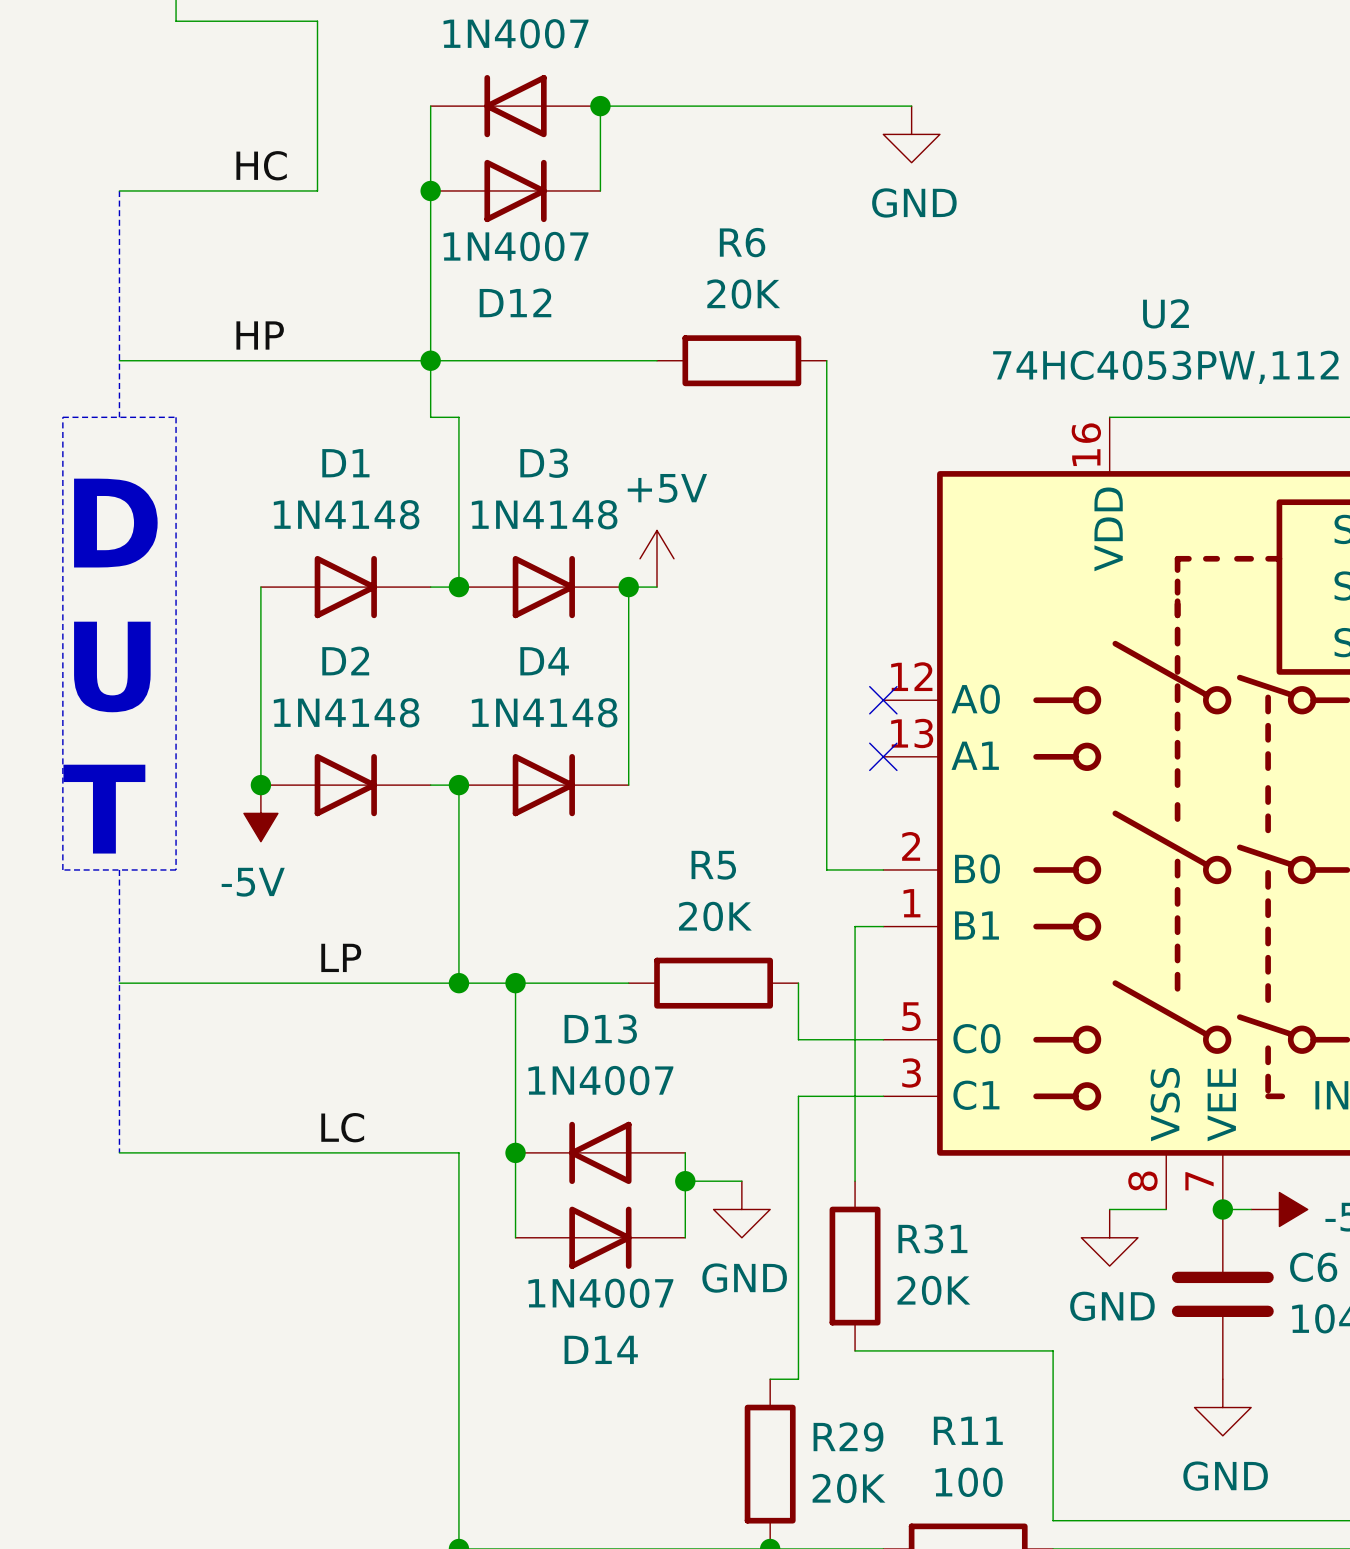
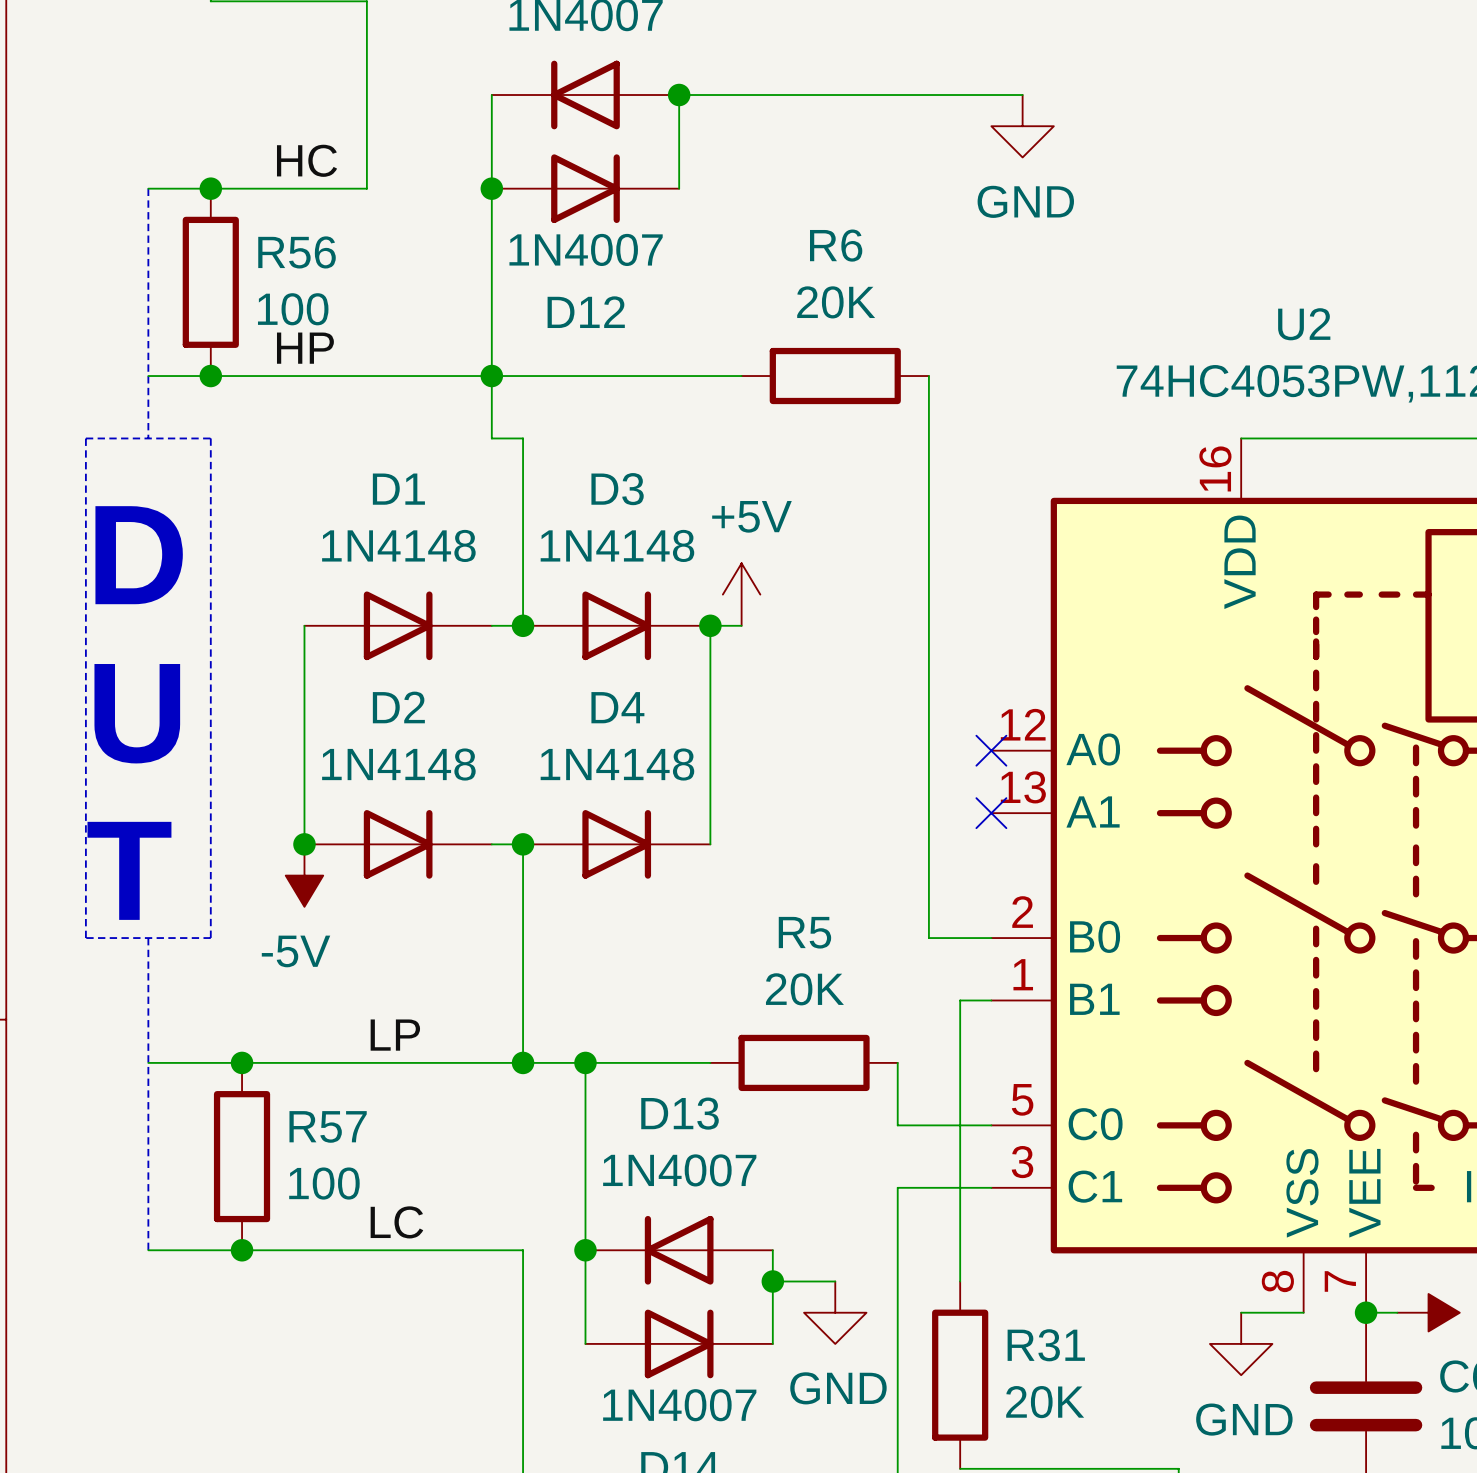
junction: none -> (210, 188)
R56: none -> 100 (210, 282)
junction: none -> (210, 376)
junction: none -> (242, 1062)
R57: none -> 100 (242, 1156)
junction: none -> (242, 1250)

